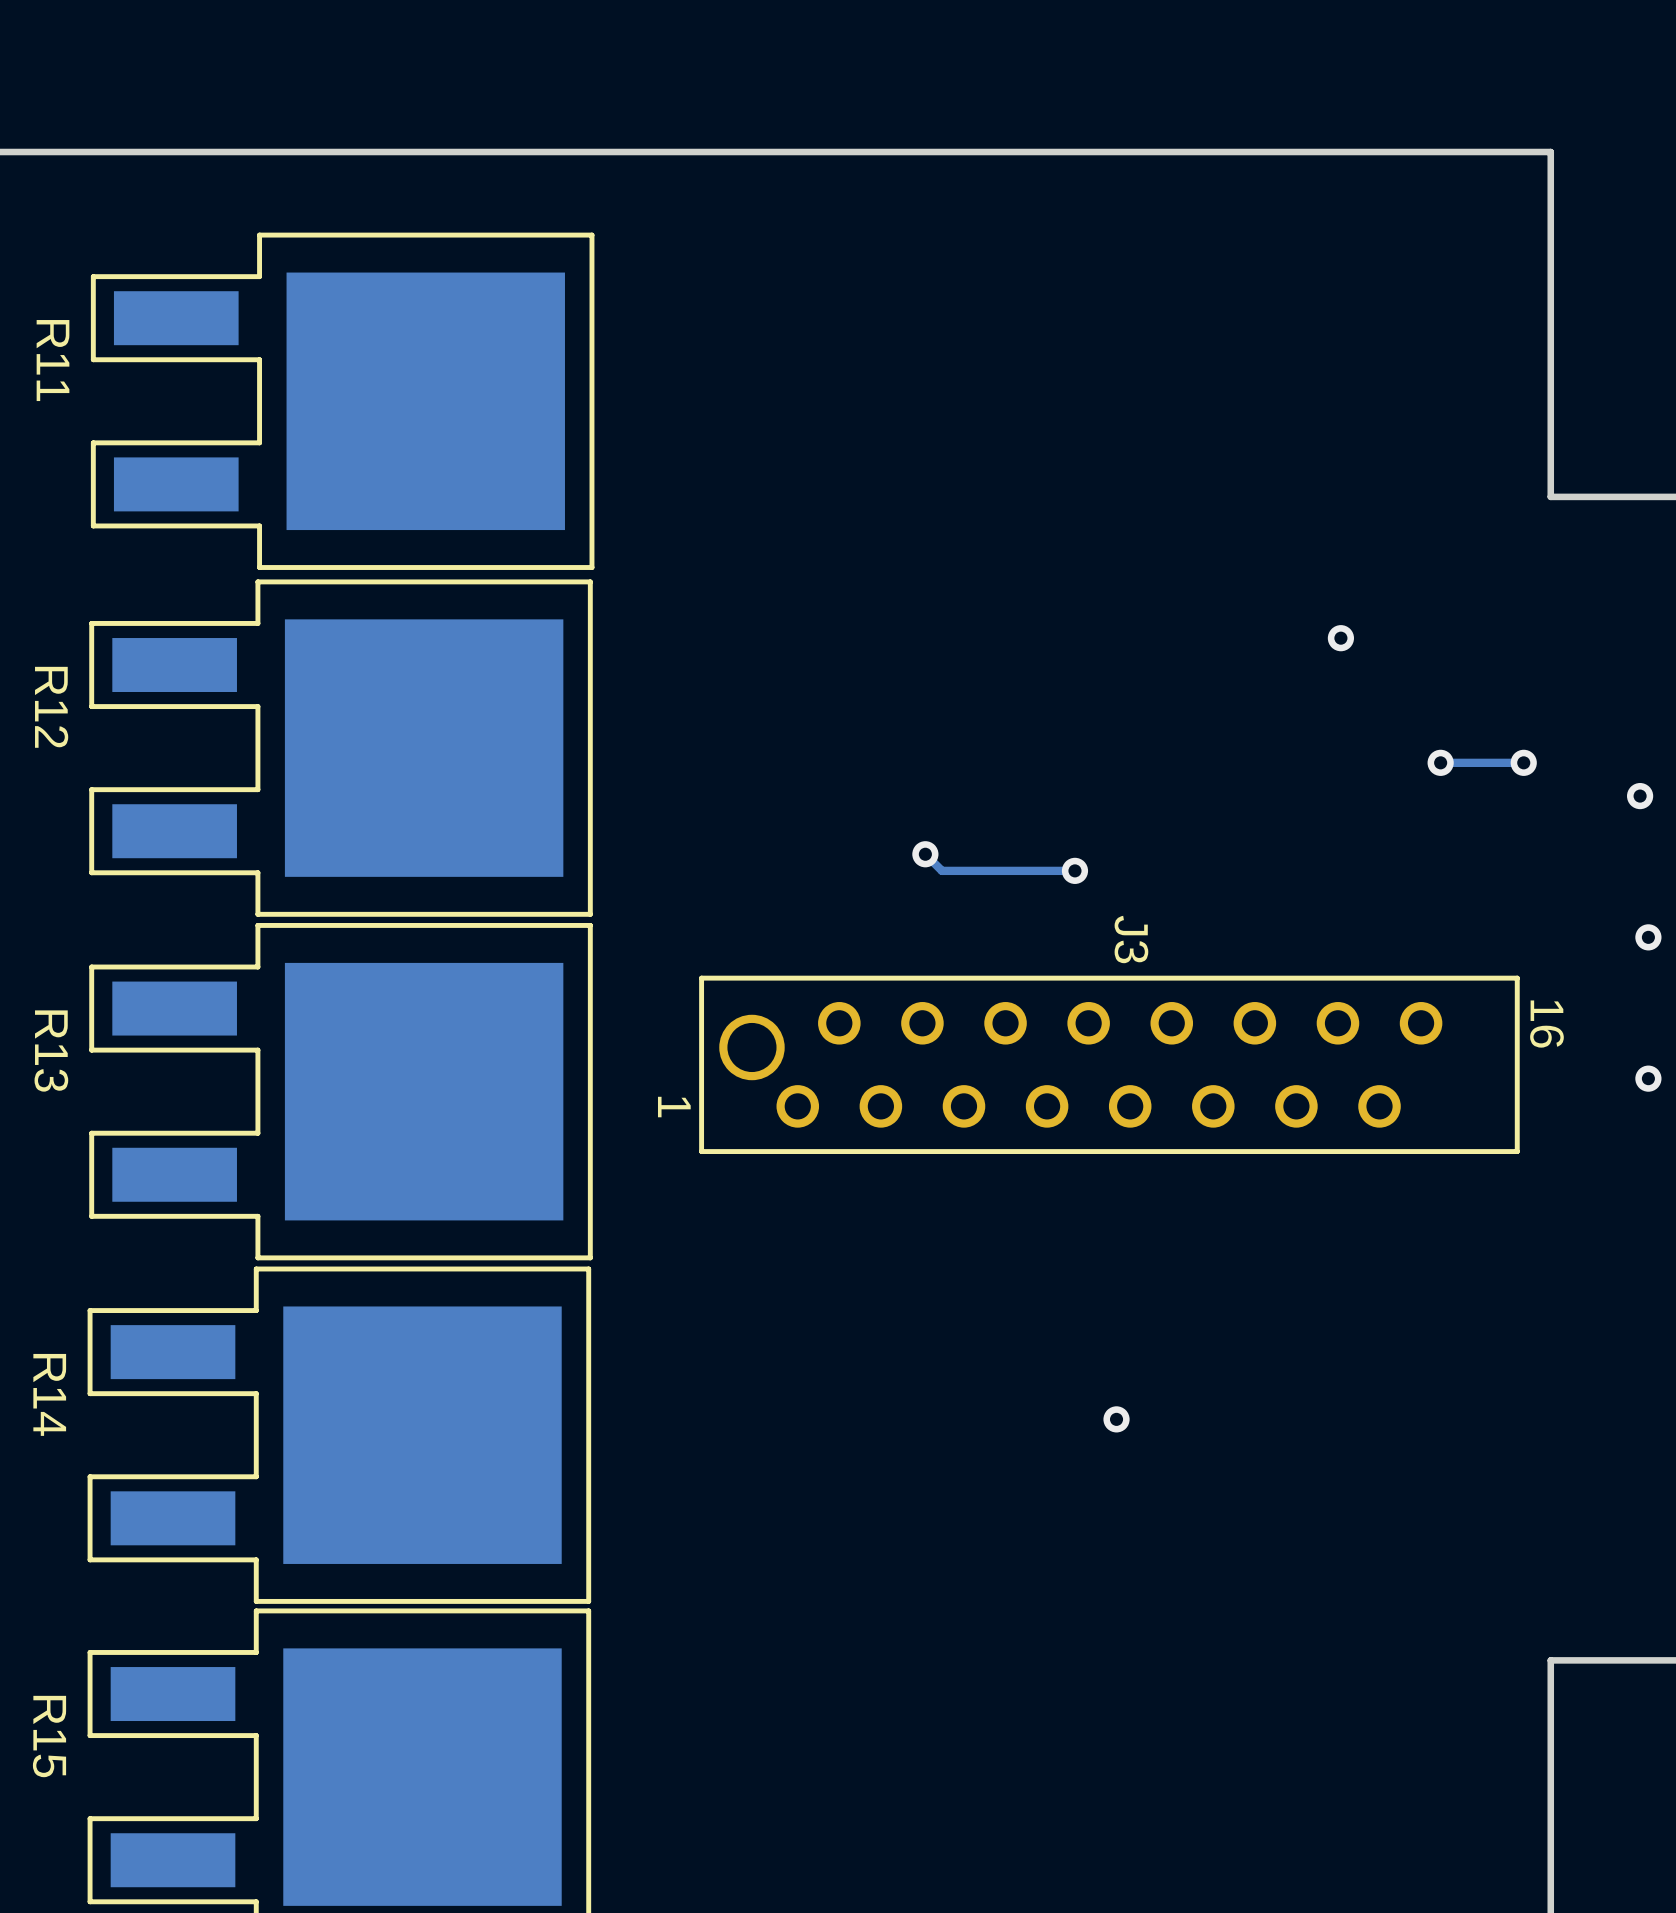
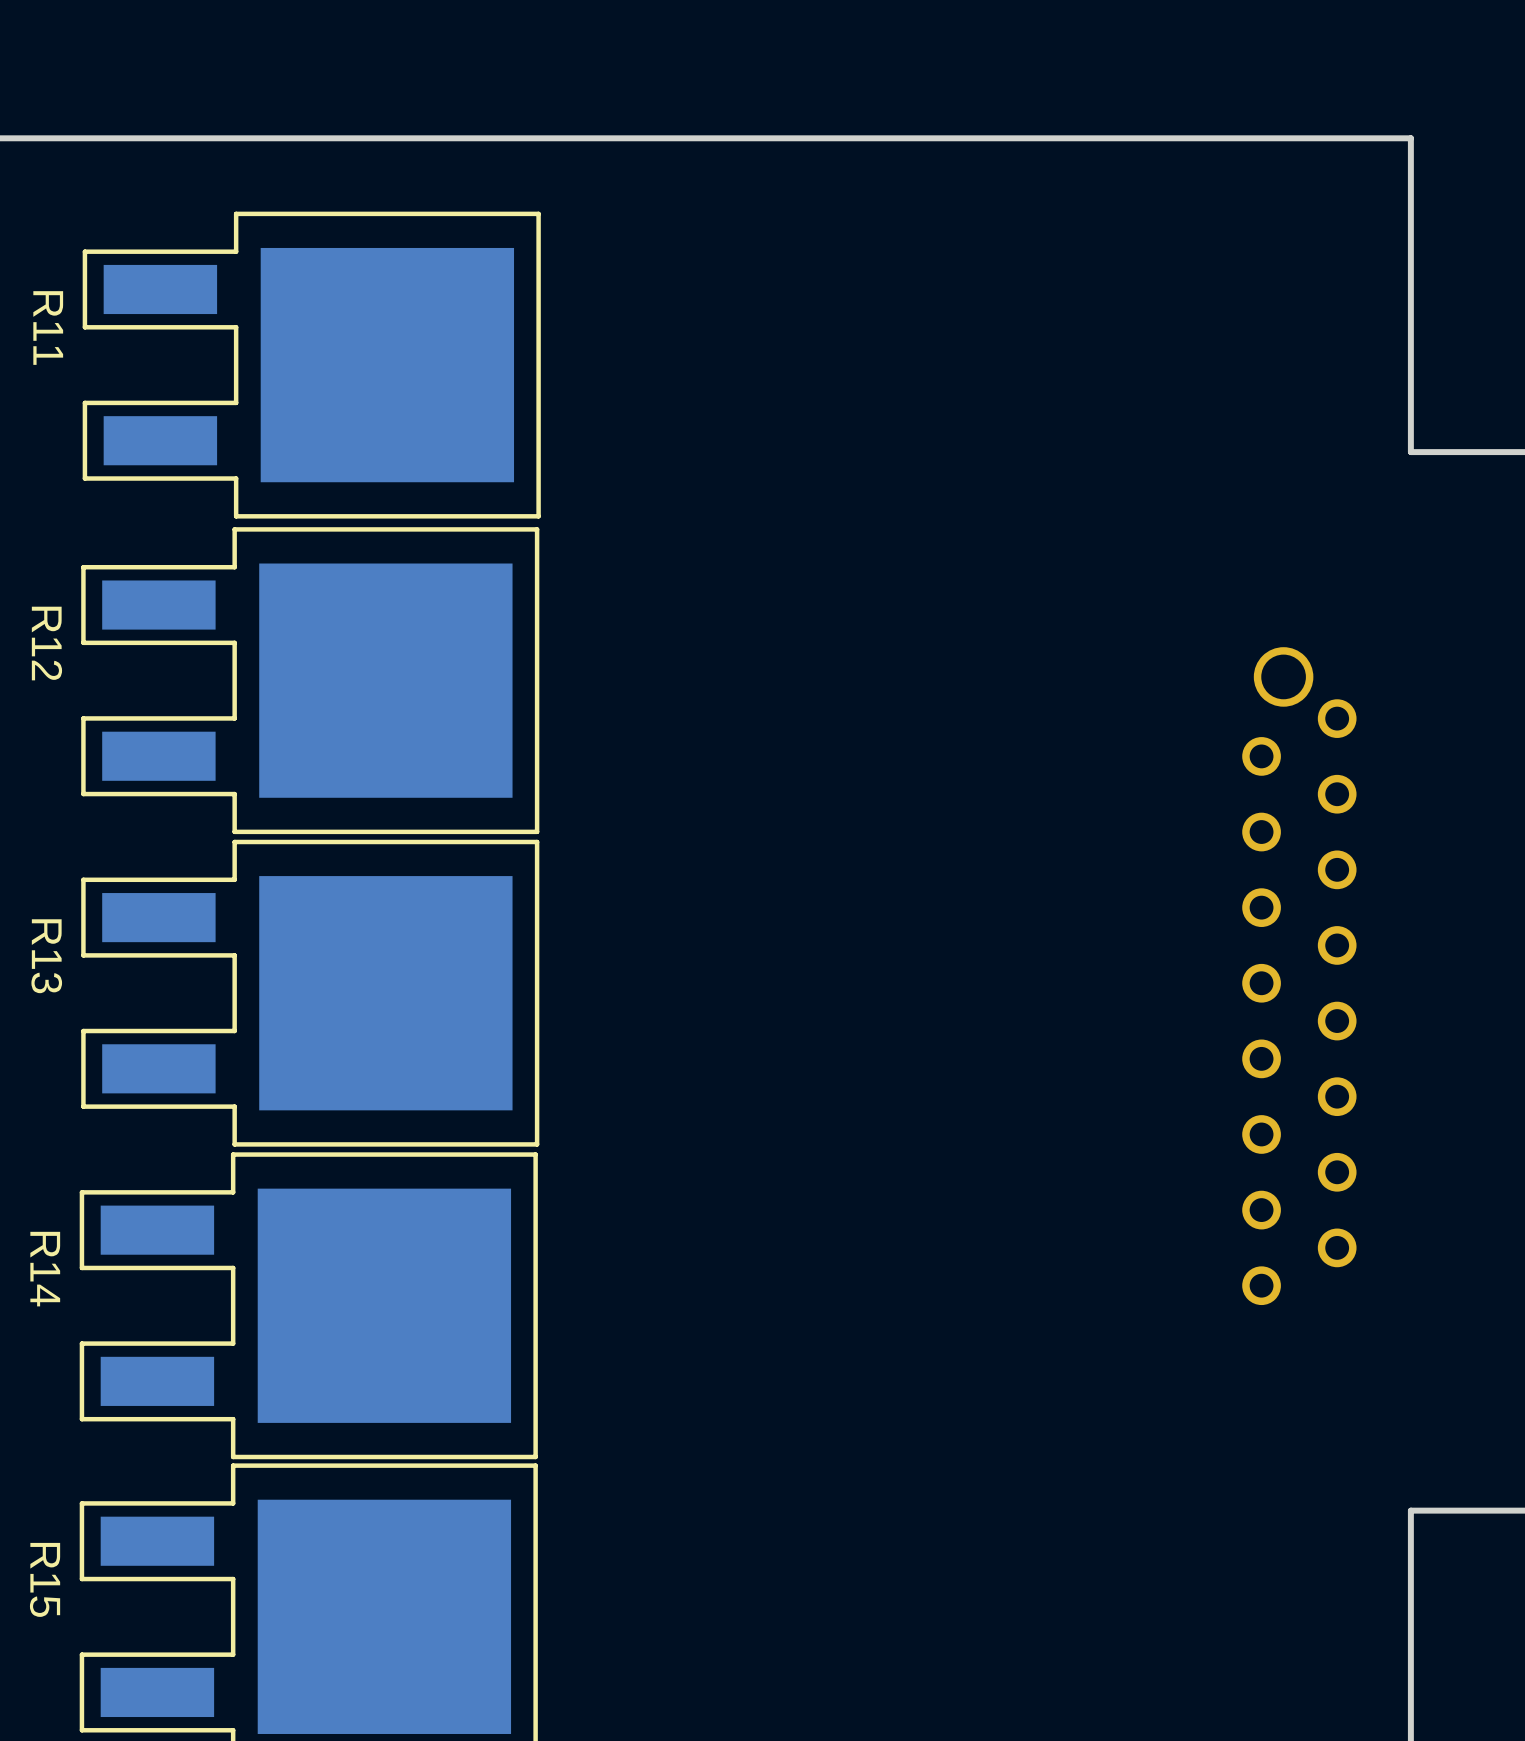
via: (1340, 638) -> none
via: (1440, 762) -> none
track: (1523, 762) (1440, 762) -> none
via: (1523, 762) -> none
via: (1640, 796) -> none
track: (925, 854) (942, 870) (1074, 870) -> none
via: (925, 854) -> none
via: (1074, 870) -> none
via: (1648, 937) -> none
J3 side: bottom (1109, 1064) -> top (1299, 976)
via: (1648, 1078) -> none
via: (1116, 1419) -> none

